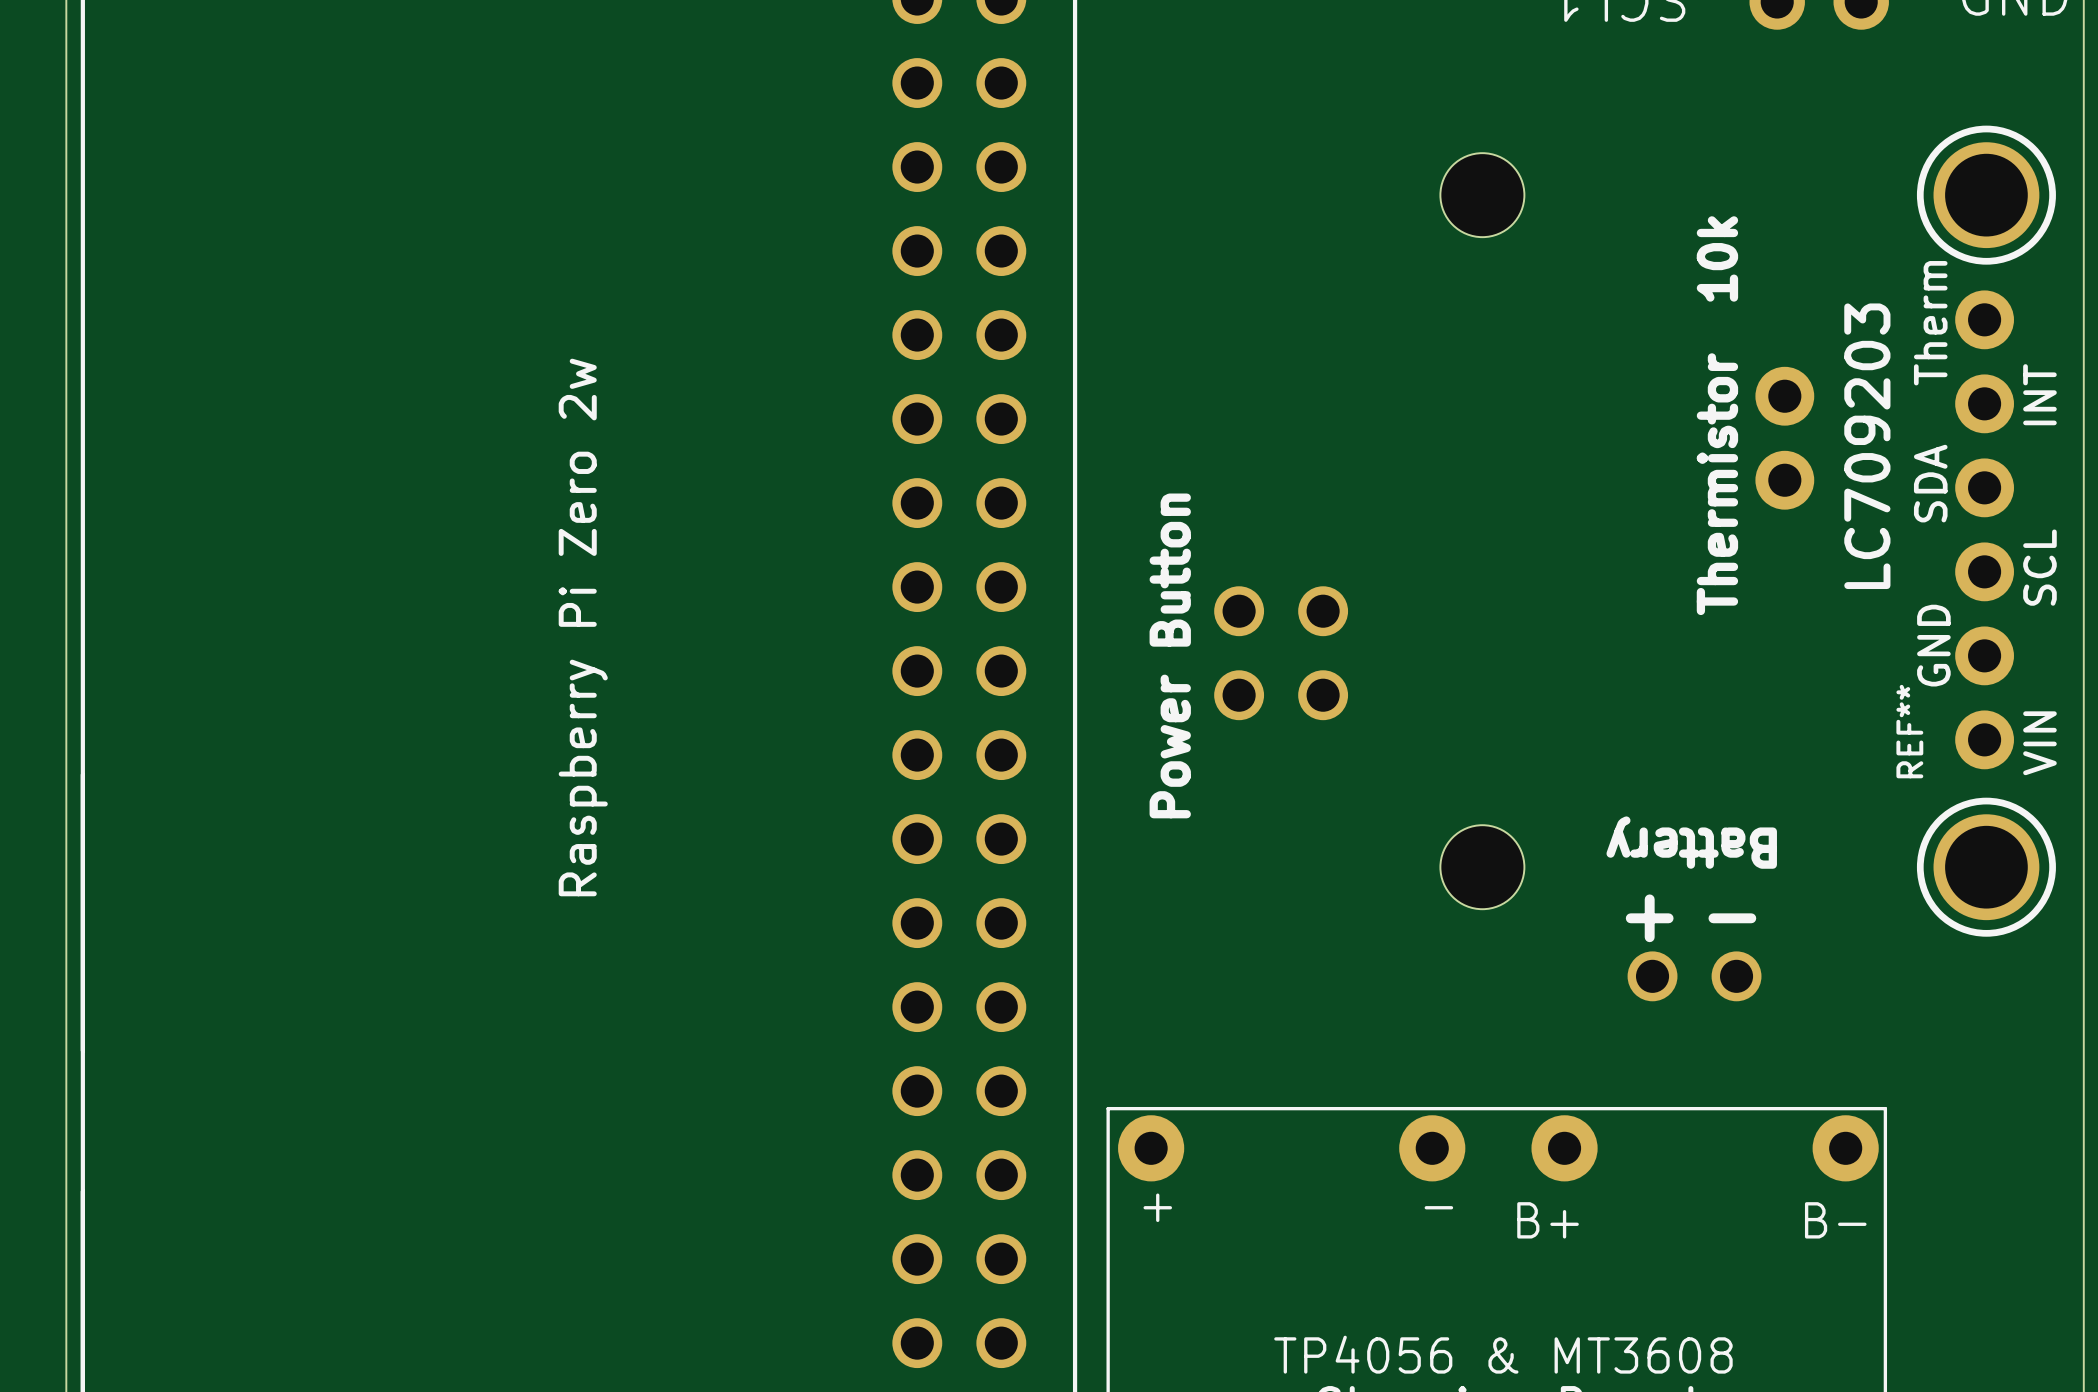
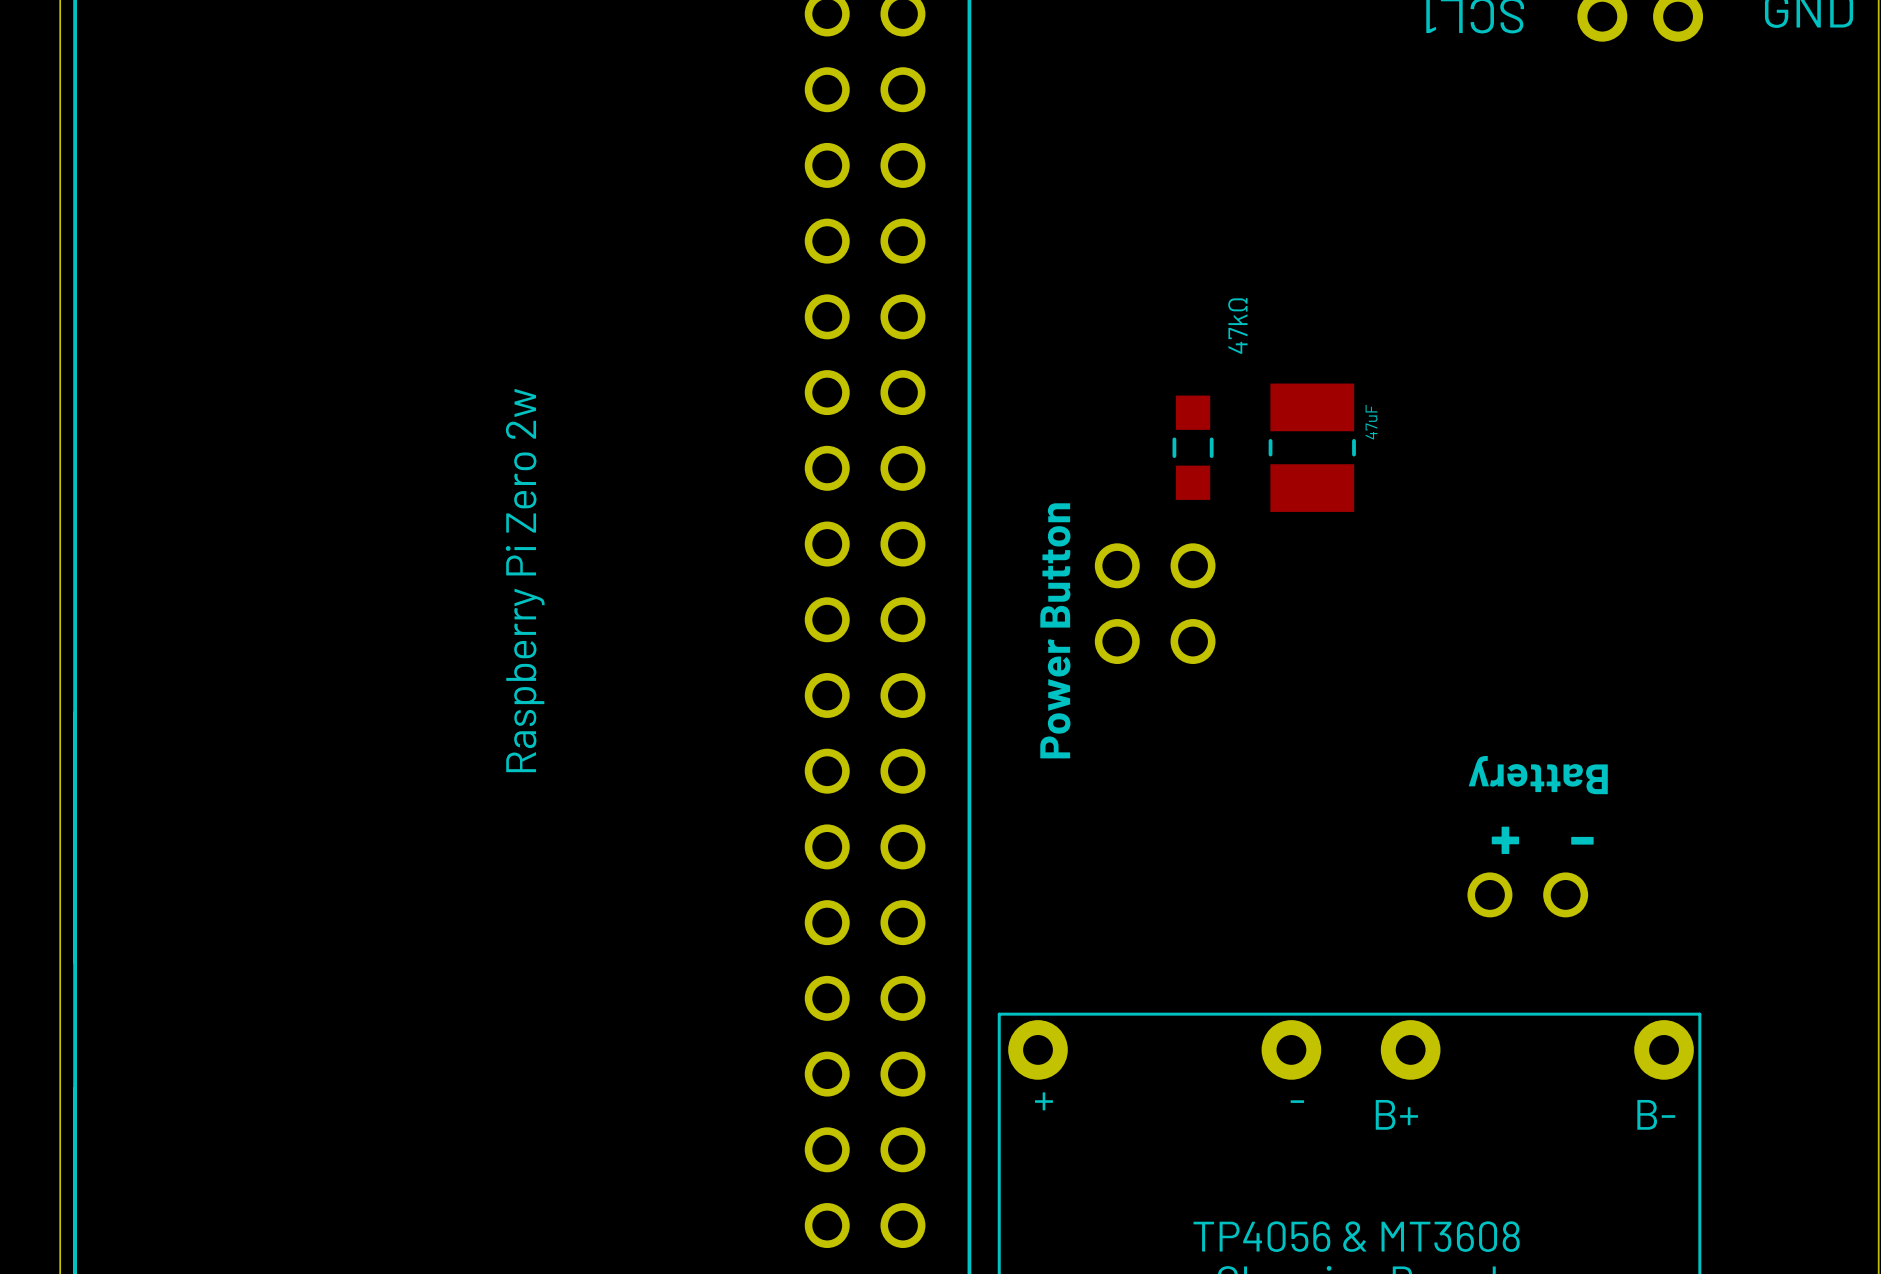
part: (1482, 195) -> none
part: (1986, 195) -> none
text: Therm (1930, 323) -> none
text: INT (2039, 394) -> none
part: (1784, 396) -> none
text: Thermistor 10k (1717, 415) -> none
text: LC709203 (1867, 446) -> none
part: none -> 47kΩ (1193, 447)
part: none -> 47uF (1312, 447)
part: (1784, 480) -> none
text: SDA (1930, 483) -> none
REF**: (1984, 529) -> none
text: SCL (2039, 567) -> none
text: GND (1933, 645) -> none
text: VIN (2039, 743) -> none
part: (1482, 867) -> none
part: (1986, 867) -> none

